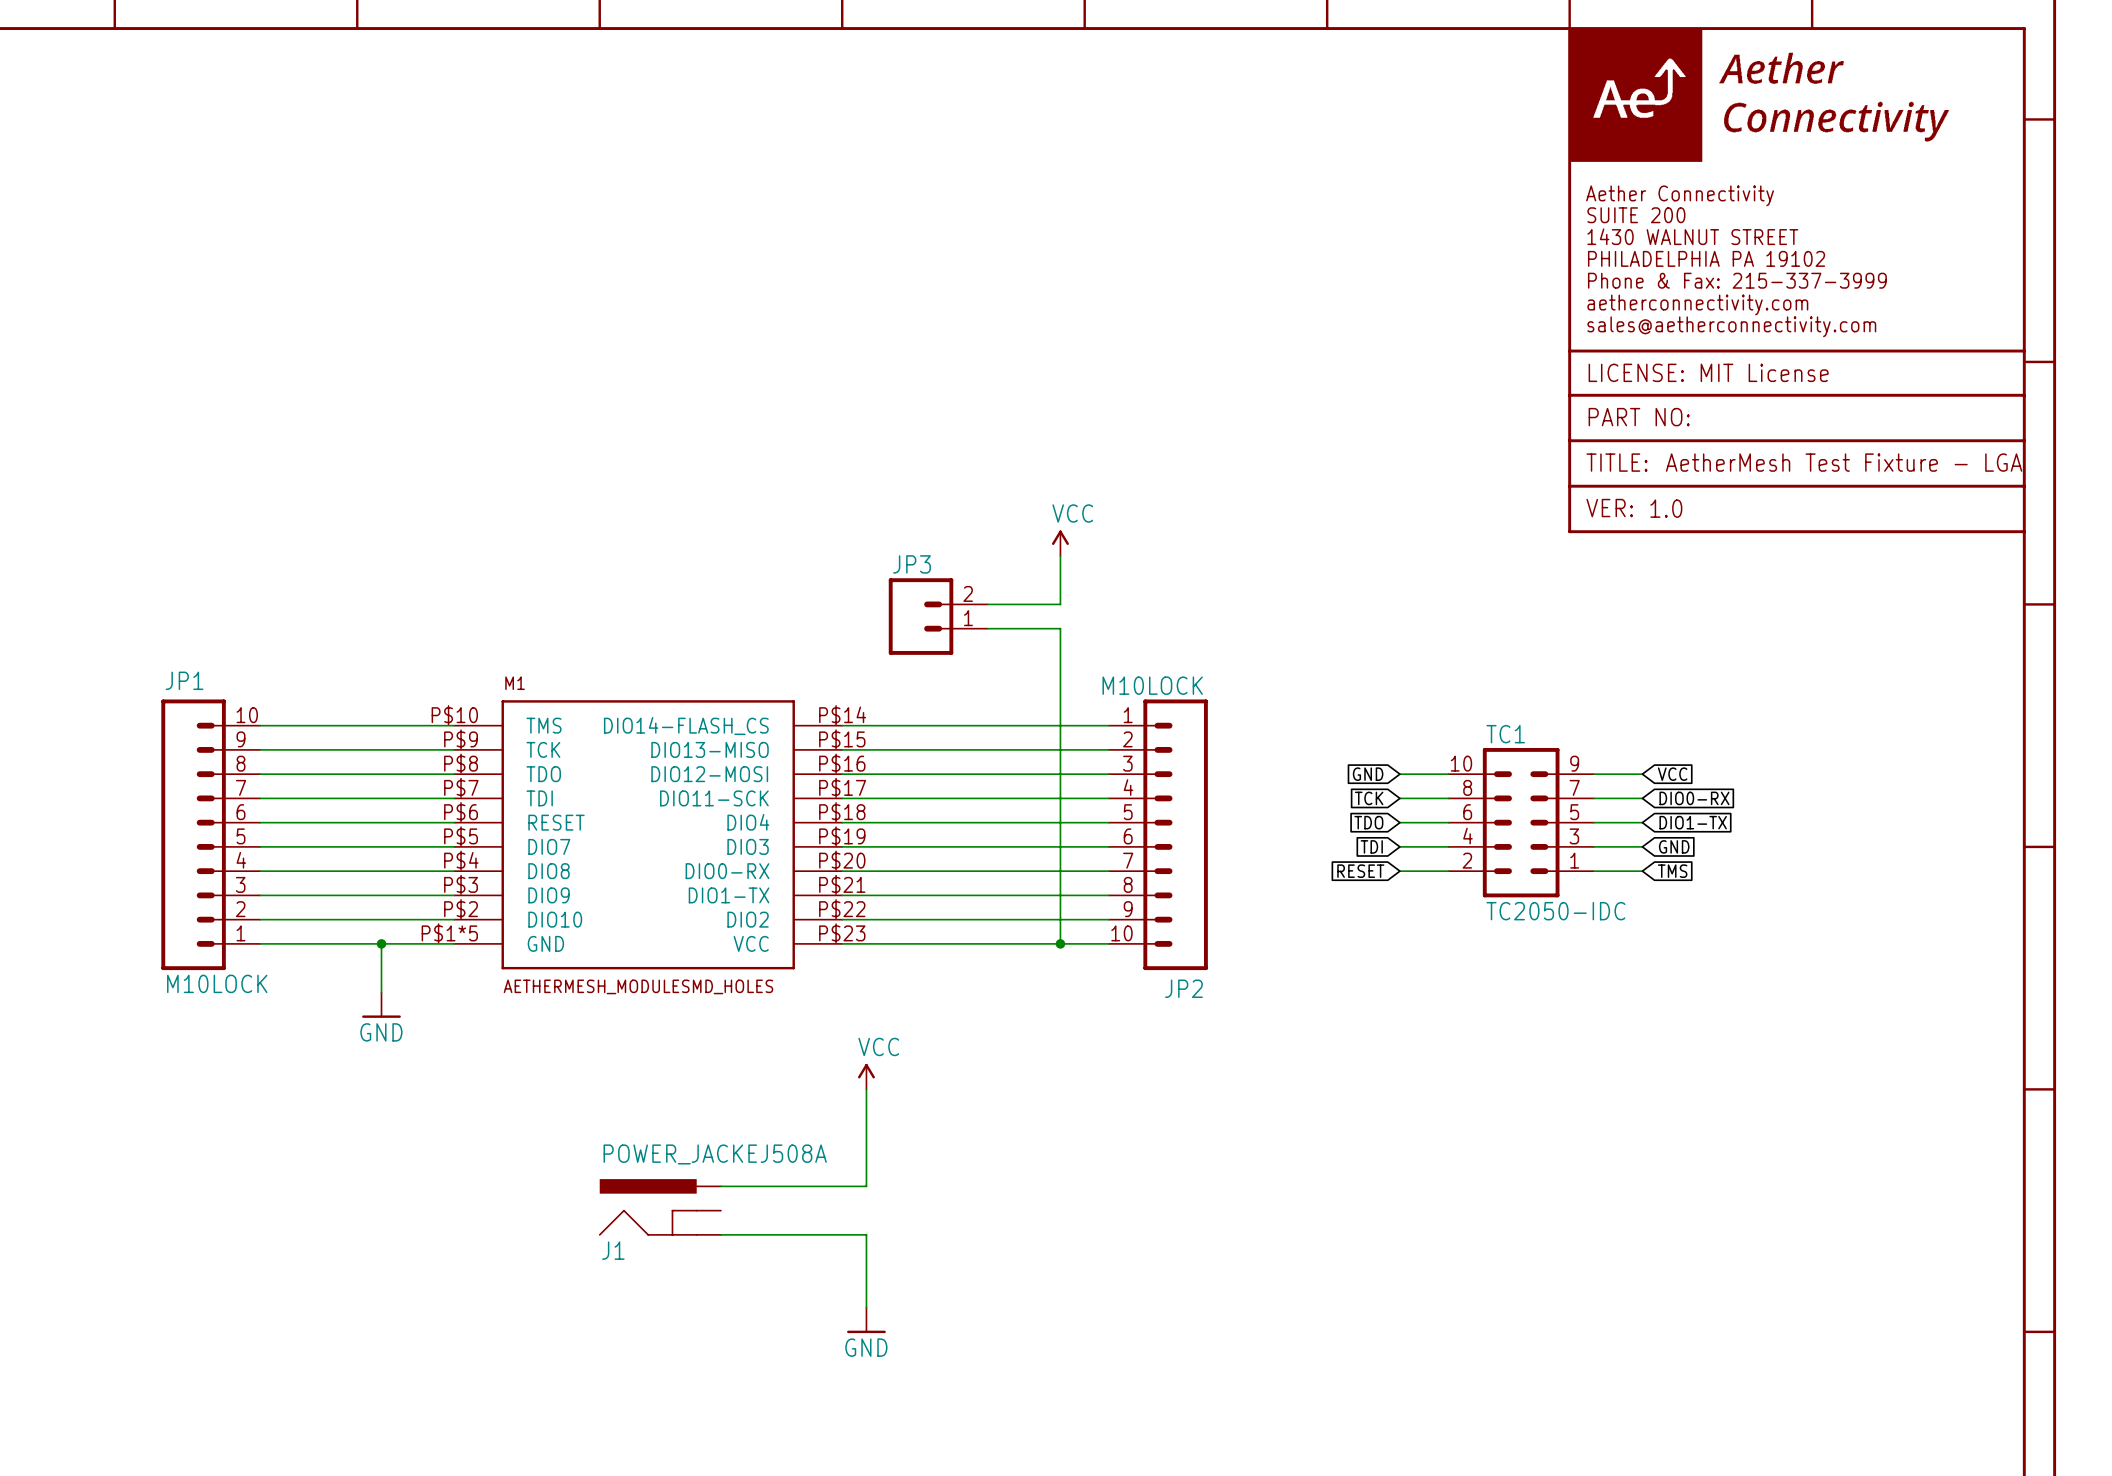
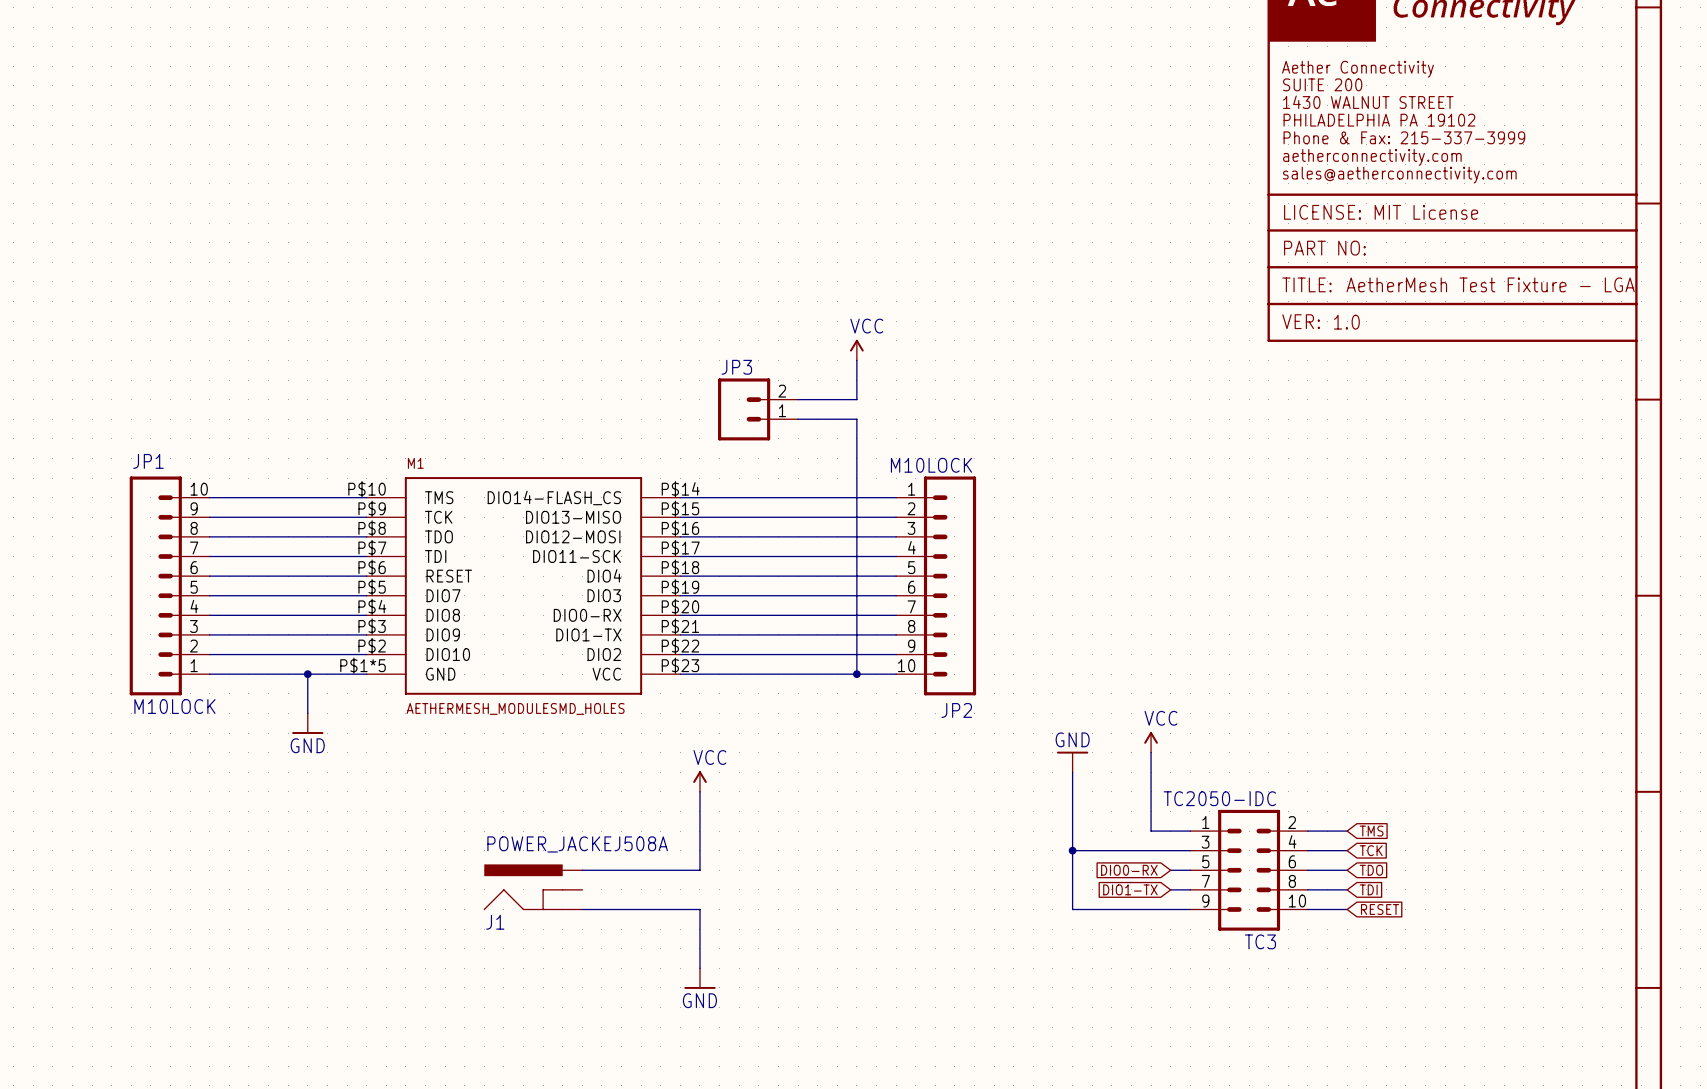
global label: GND (1368, 774) -> none
wire: (1399, 774) (1448, 774) -> none
wire: (1593, 774) (1642, 774) -> none
global label: VCC (1672, 774) -> none
global label: TCK (1369, 798) -> none
wire: (1399, 798) (1448, 798) -> none
wire: (1593, 798) (1642, 798) -> none
global label: DIO0-RX (1694, 798) -> none
global label: TDO (1368, 822) -> none
wire: (1399, 822) (1448, 822) -> none
TC1: TC2050-IDC (1521, 822) -> none
wire: (1593, 822) (1642, 822) -> none
global label: DIO1-TX (1693, 822) -> none
global label: TDI (1371, 846) -> none
wire: (1399, 846) (1448, 846) -> none
wire: (1593, 846) (1642, 846) -> none
global label: GND (1674, 846) -> none
global label: RESET (1360, 871) -> none
wire: (1399, 871) (1448, 871) -> none
wire: (1593, 871) (1642, 871) -> none
global label: TMS (1672, 871) -> none
power symbol: none -> VCC (1151, 742)
wire: none -> (1151, 752) (1151, 831) (1190, 831)
power symbol: none -> GND (1072, 761)
wire: none -> (1072, 772) (1072, 909) (1190, 909)
wire: none -> (1307, 831) (1347, 831)
global label: none -> TMS (1371, 831)
wire: none -> (1072, 850) (1190, 850)
junction: none -> (1072, 850)
wire: none -> (1307, 850) (1347, 850)
global label: none -> TCK (1371, 850)
global label: none -> DIO0-RX (1129, 870)
wire: none -> (1170, 870) (1190, 870)
TC3: none -> TC2050-IDC (1249, 870)
wire: none -> (1307, 870) (1347, 870)
global label: none -> TDO (1371, 870)
global label: none -> DIO1-TX (1130, 889)
wire: none -> (1170, 889) (1190, 889)
wire: none -> (1307, 889) (1347, 889)
global label: none -> TDI (1368, 889)
wire: none -> (1307, 909) (1347, 909)
global label: none -> RESET (1380, 909)

